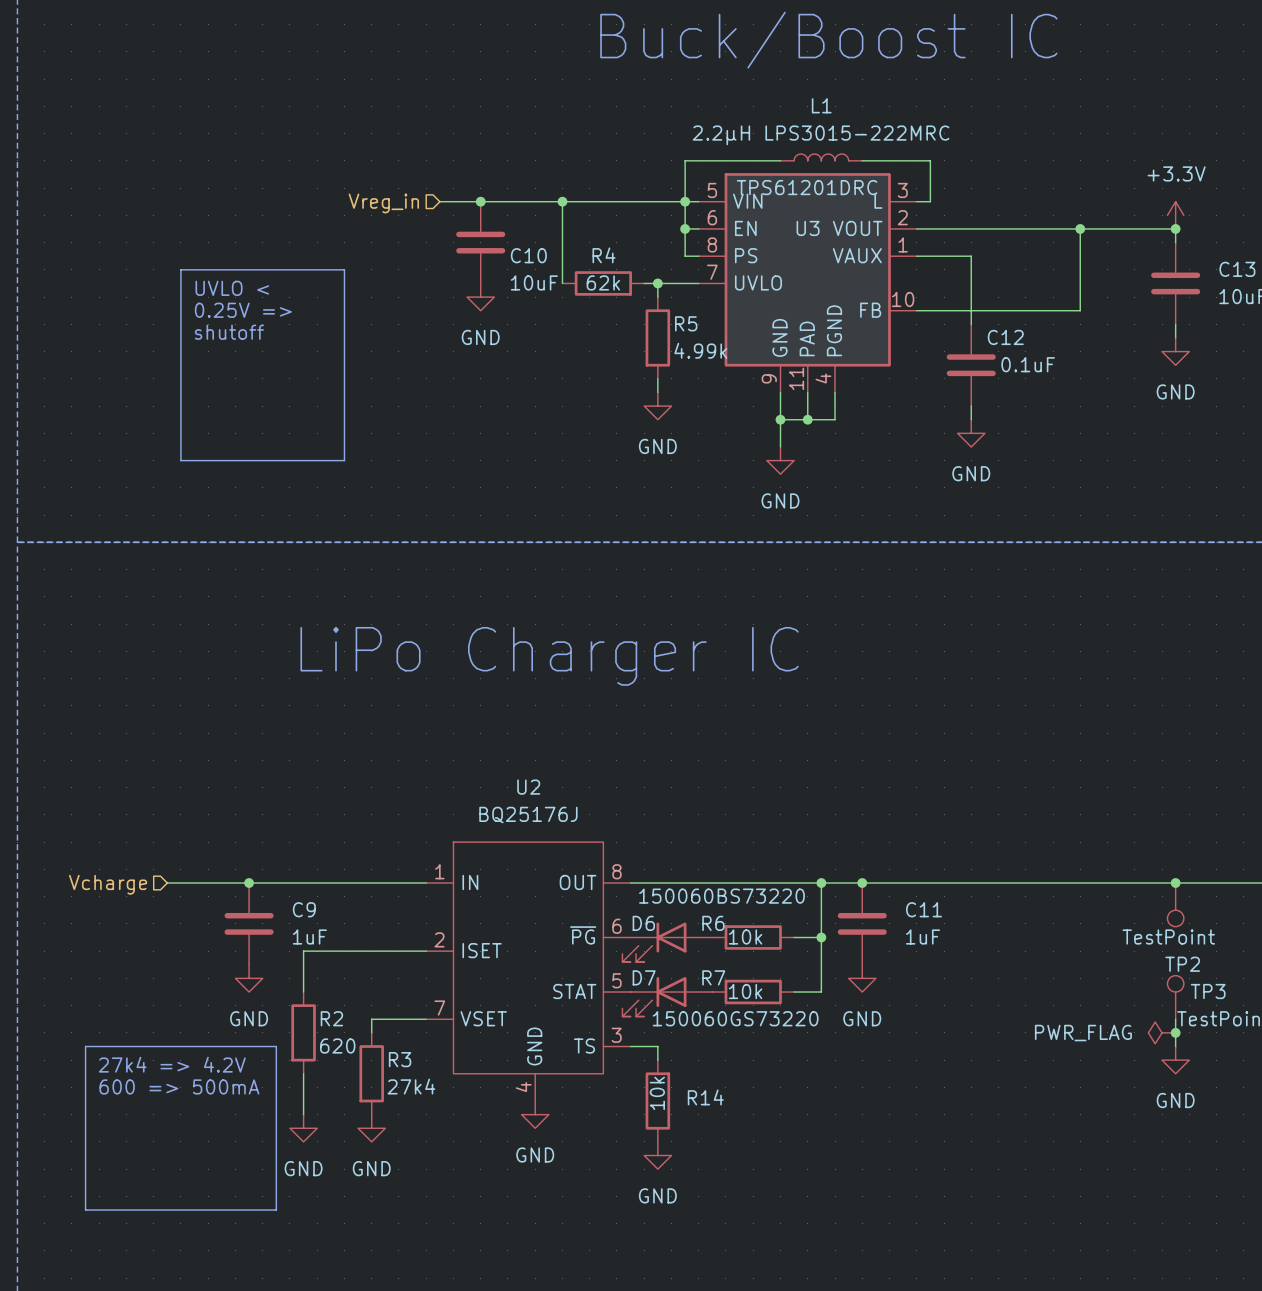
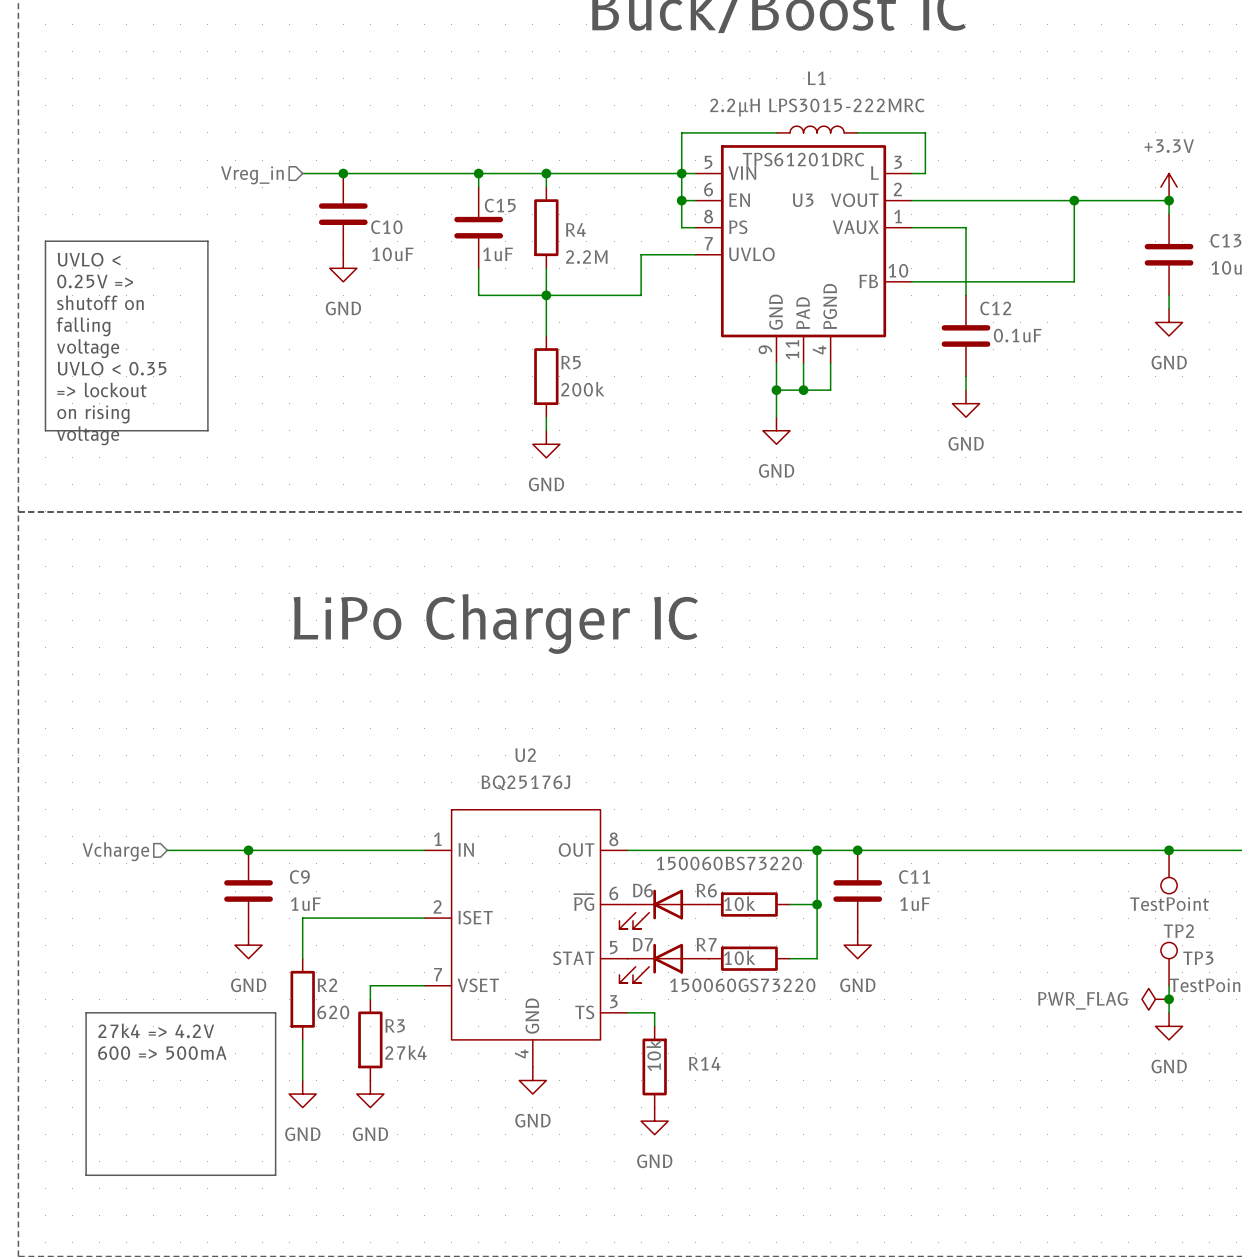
wire: none -> (302, 173) (438, 173)
junction: none -> (343, 173)
wire: (562, 201) (562, 283) -> none
junction position: (562, 201) -> (546, 173)
hierarchical label position: Vreg_in (383, 203) -> Vreg_in (252, 175)
C10 position: (480, 242) -> (343, 214)
C15: none -> 1uF (478, 227)
line: (180, 269) (180, 460) -> (180, 241) (45, 241) (45, 430) (180, 430)
line: (208, 269) (344, 269) (344, 460) (208, 460) -> (207, 241) (207, 430)
R4 value: 62k (603, 282) -> 2.2M (586, 257)
R4 rotation: 0° (603, 283) -> 90° clockwise (546, 227)
R4 position: (603, 283) -> (546, 227)
wire: none -> (641, 254) (641, 295) (478, 295) (478, 268)
wire: (657, 283) (657, 297) -> (546, 173) (546, 187)
junction: (657, 283) -> none
text position: UVLO < (232, 288) -> UVLO < (89, 259)
power symbol: none -> GND (343, 268)
power symbol: GND (480, 297) -> none
wire: none -> (546, 268) (546, 335)
text position: 0.25V => (243, 310) -> 0.25V => (95, 281)
junction: none -> (546, 295)
text: none -> shutoff on (100, 302)
text: shutoff (229, 332) -> none
R5 position: (657, 337) -> (546, 376)
R5 value: 4.99k (700, 350) -> 200k (582, 389)
text: none -> falling (83, 326)
text: none -> voltage (88, 348)
wire: (657, 378) (657, 392) -> (546, 417) (546, 430)
text: none -> UVLO < 0.35 (112, 368)
power symbol: GND (657, 406) -> none
text: none -> => lockout (101, 390)
text: none -> on rising (93, 414)
text: none -> voltage (88, 435)
power symbol: none -> GND (546, 444)

